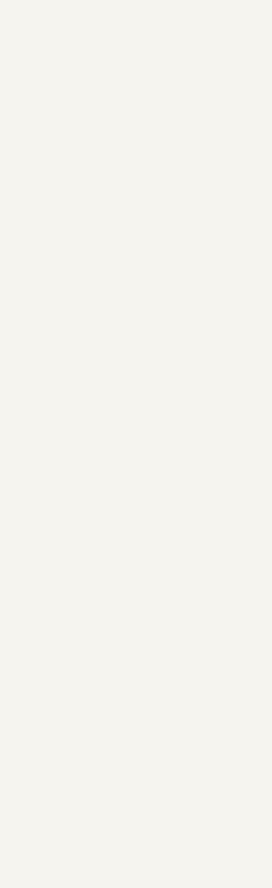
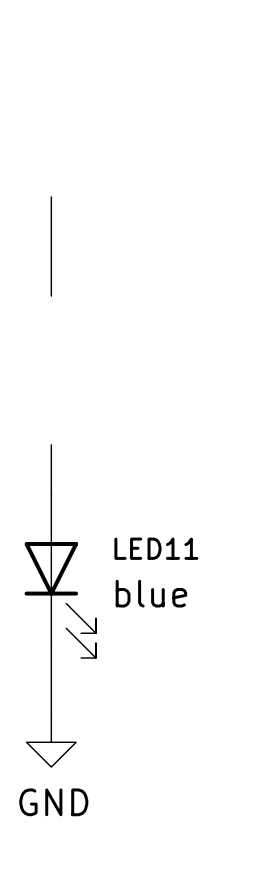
wire: none -> (51, 197) (51, 296)
wire: none -> (51, 444) (51, 494)
LED11: none -> blue (60, 576)
wire: none -> (51, 643) (51, 717)
power symbol: none -> GND (51, 742)

